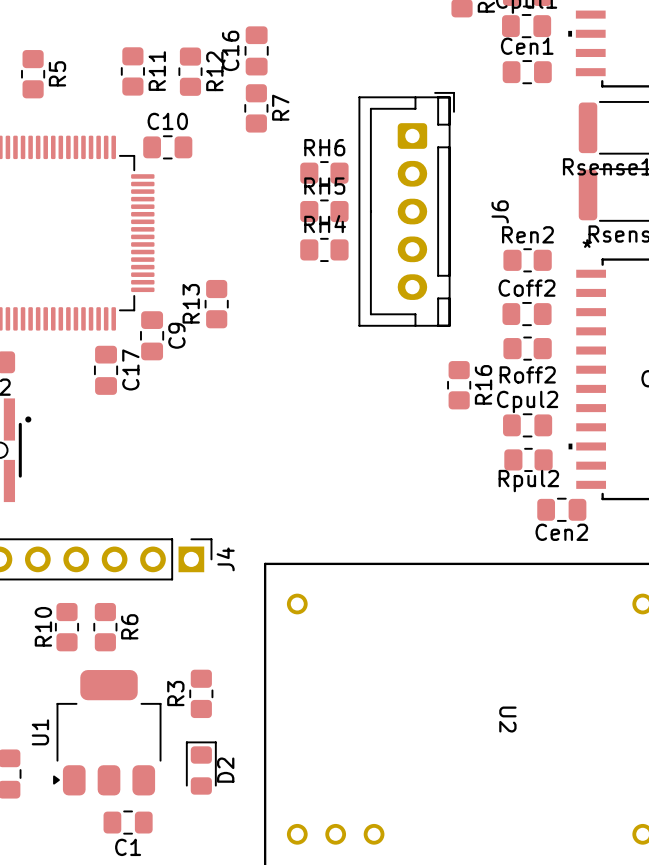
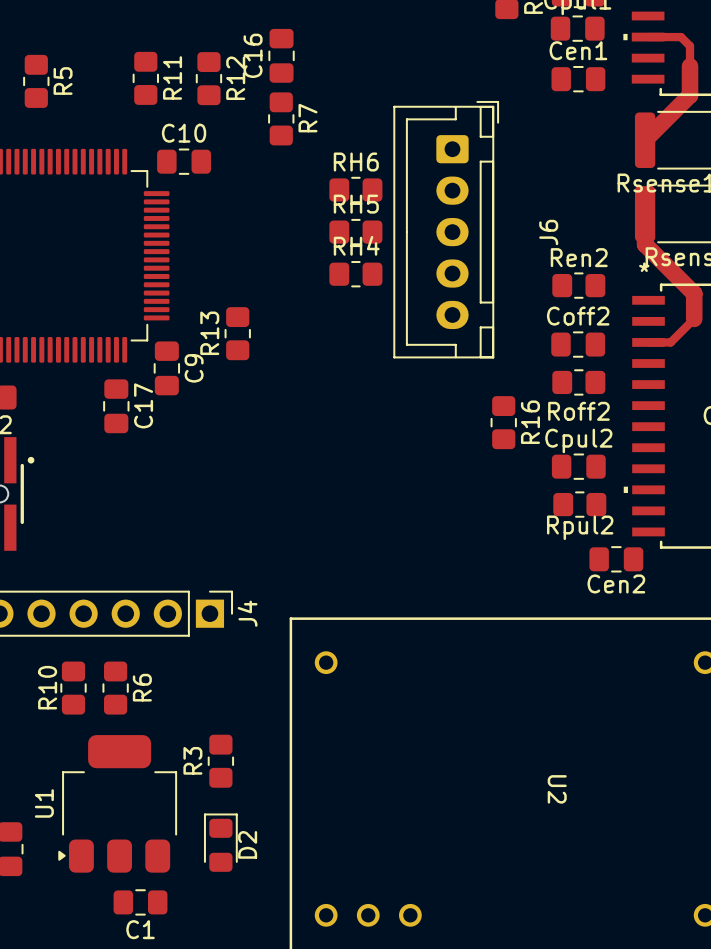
track: none -> (648, 37) (681, 37) (690, 46) (690, 95) (645, 140)
track: none -> (645, 213) (645, 244) (694, 293) (694, 318) (670, 342) (648, 342)

